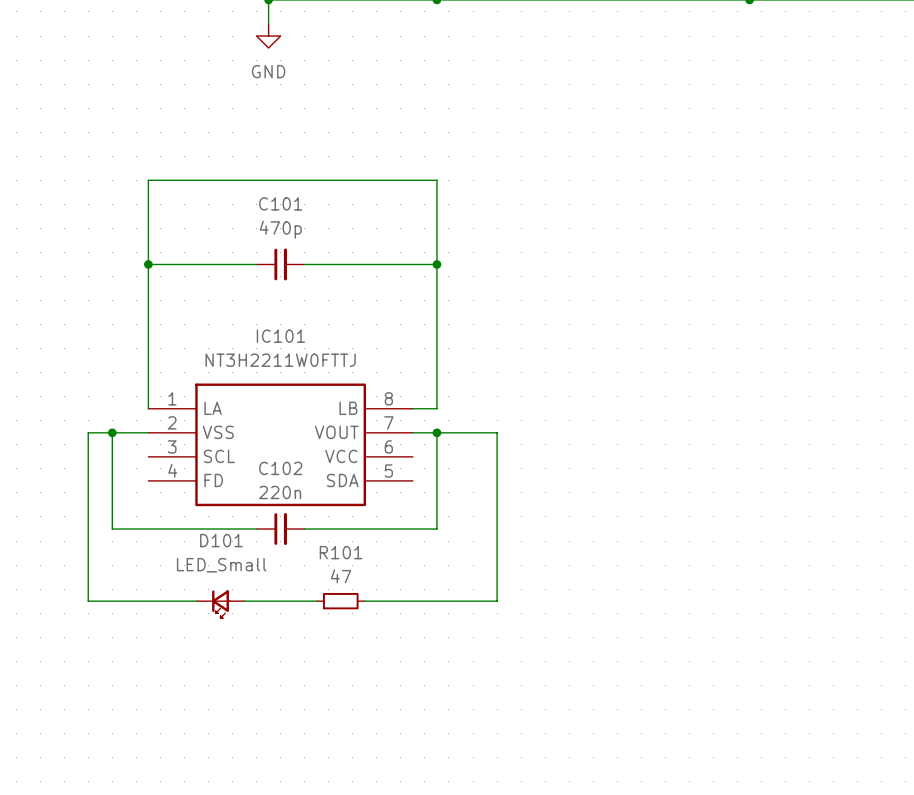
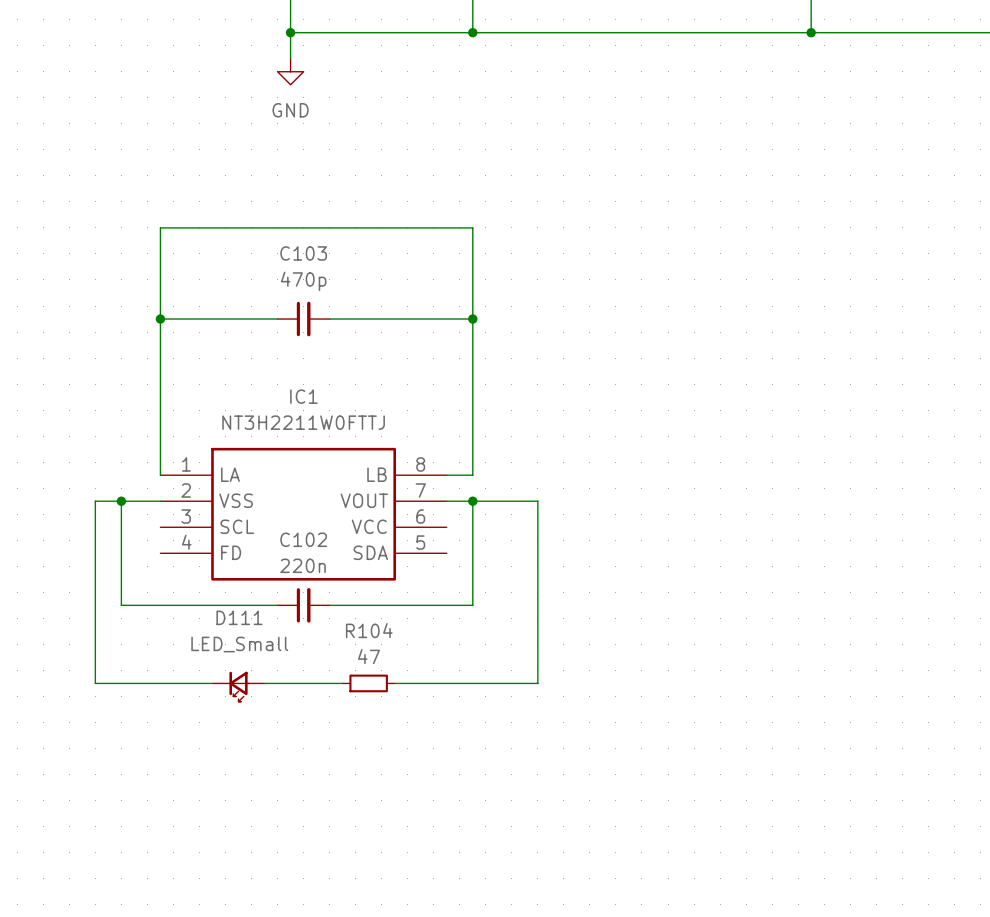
C101 name: C101 (280, 203) -> C103 (303, 253)
IC101 name: IC101 (280, 336) -> IC1 (303, 396)
D101 name: D101 (221, 540) -> D111 (239, 617)
R101 name: R101 (341, 552) -> R104 (369, 630)

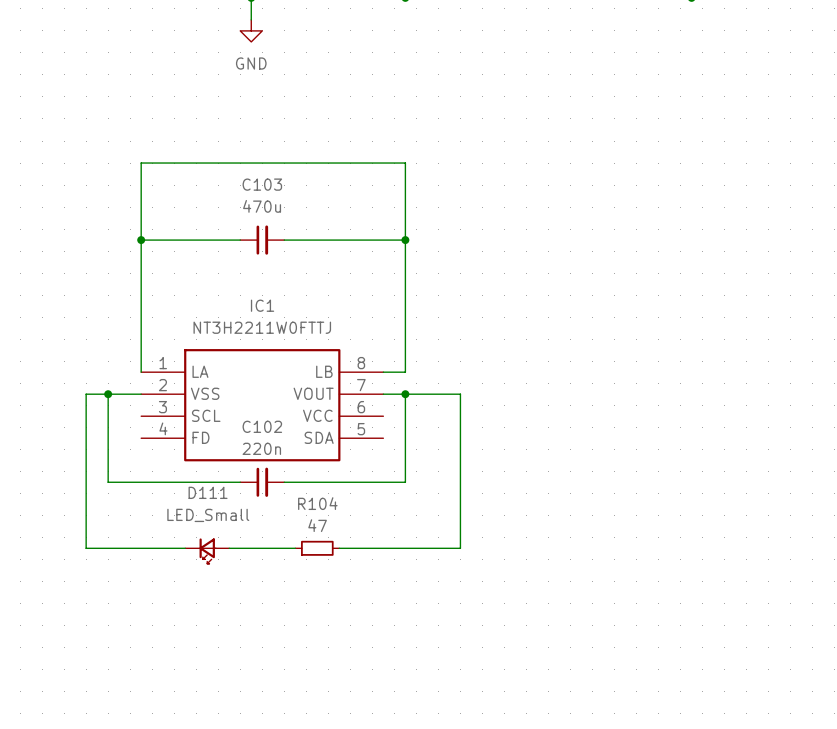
C103 value: 470p (303, 281) -> 470u (262, 206)

